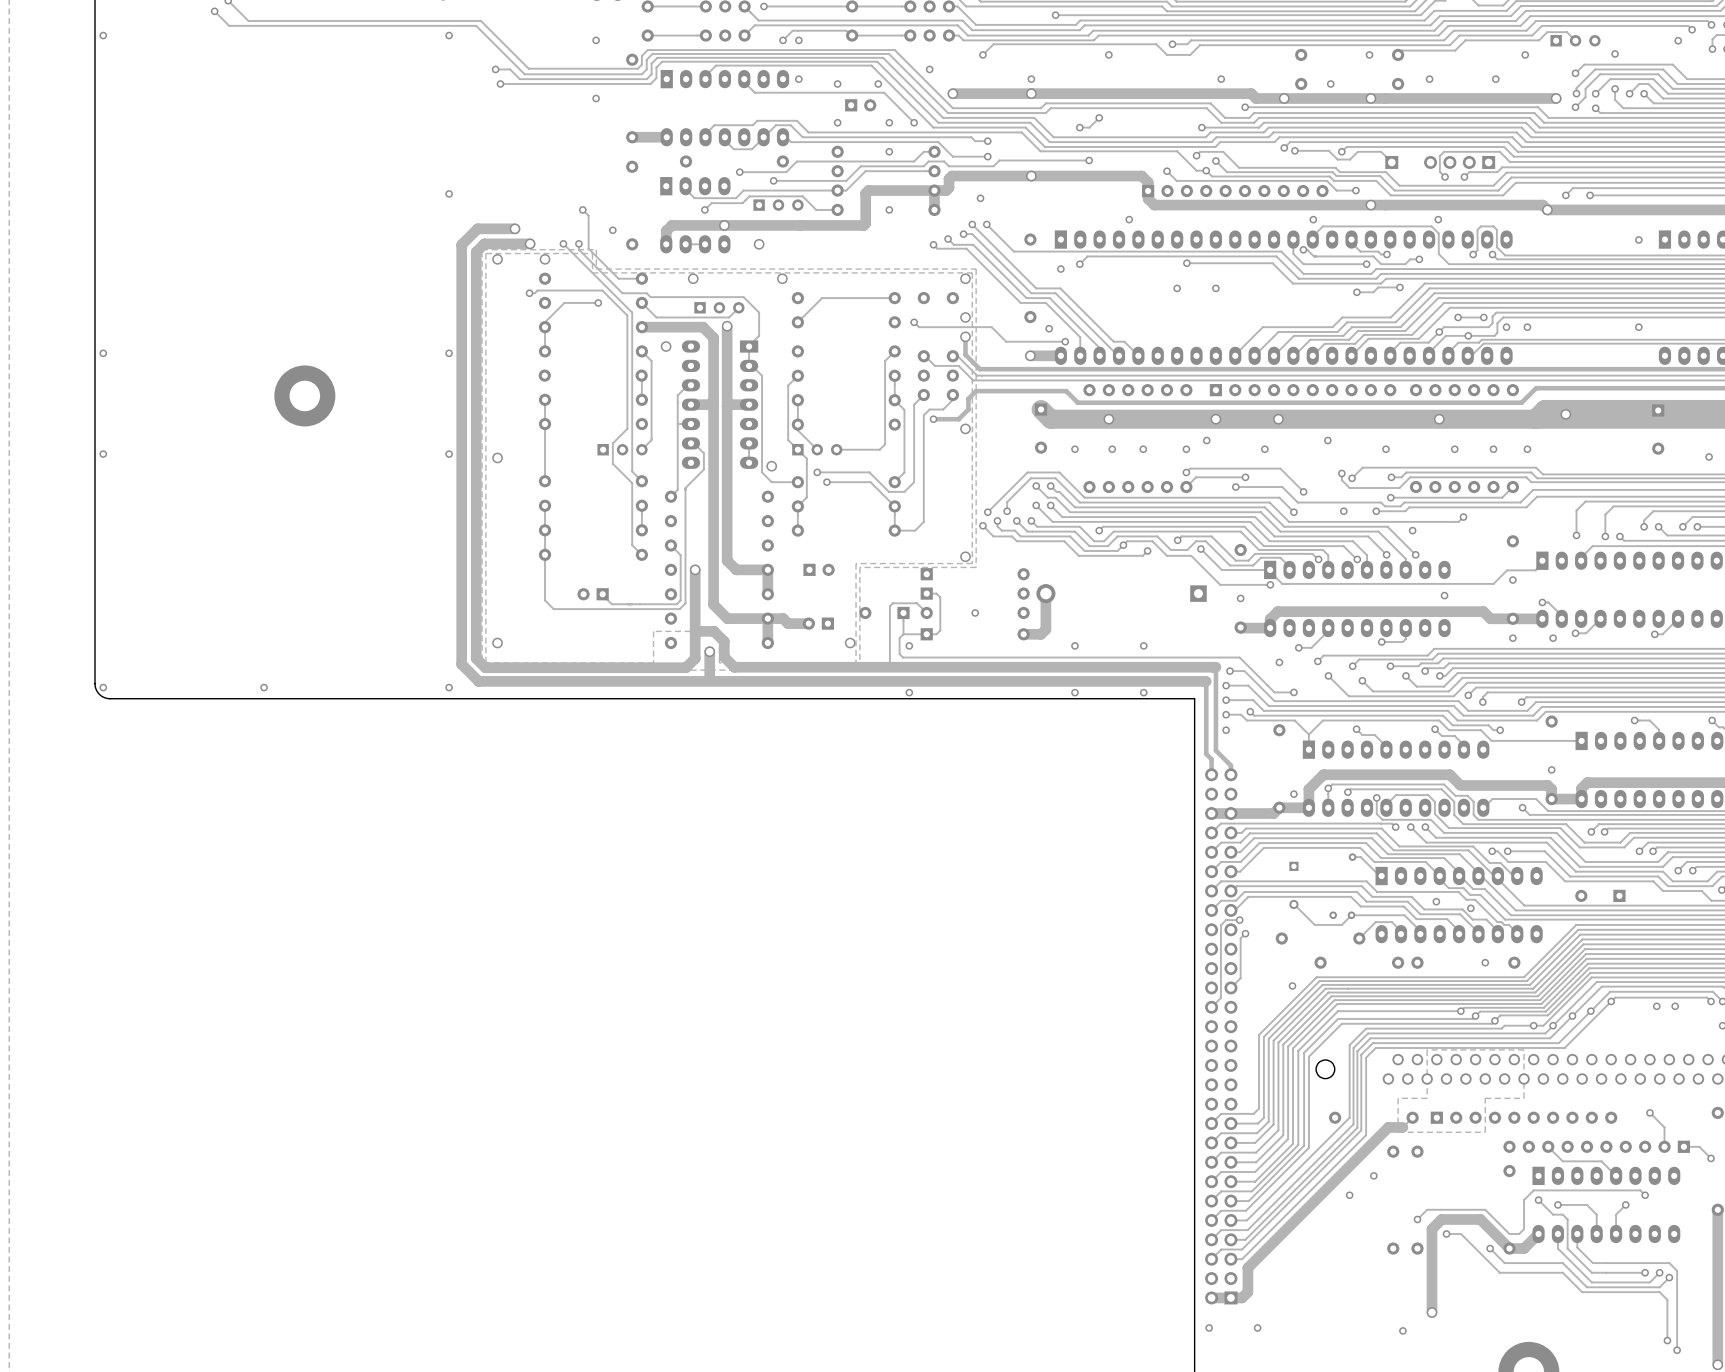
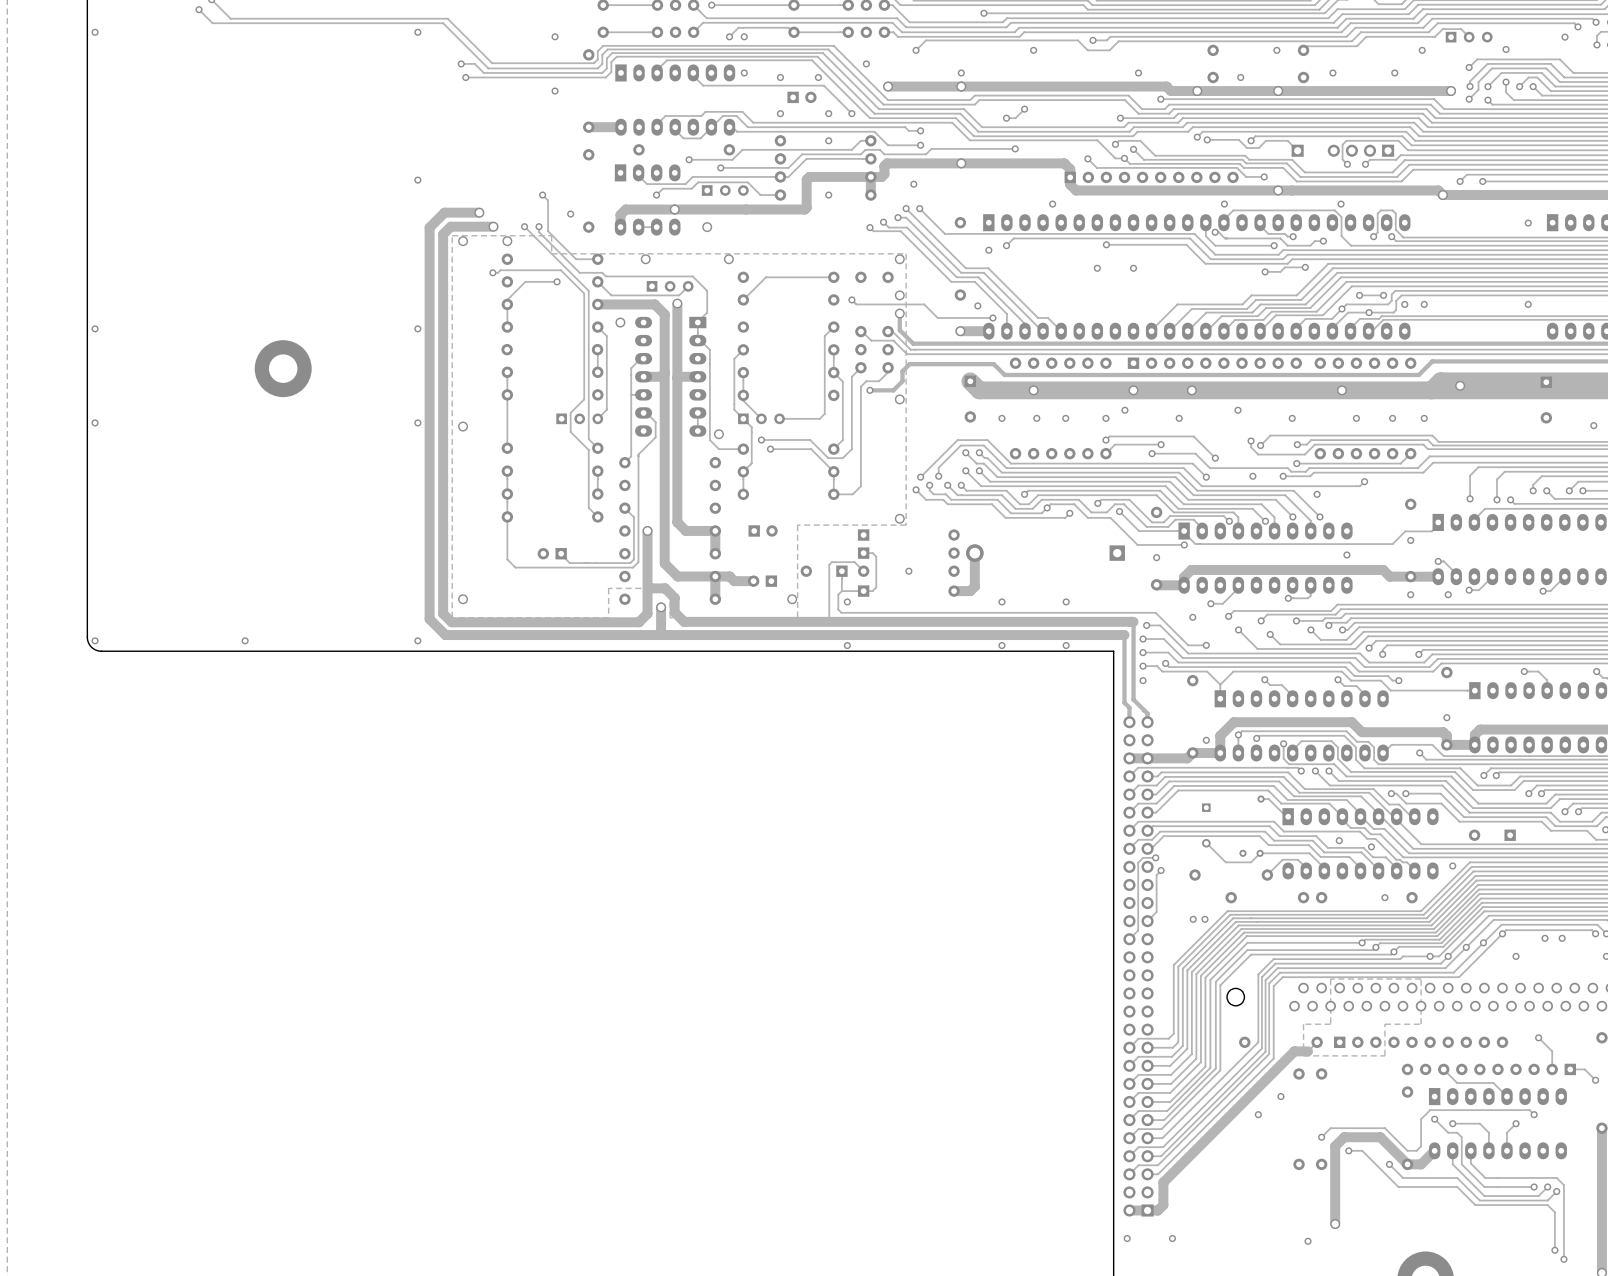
zone outline: (596, 249) (482, 249) (482, 670) (859, 670) (859, 567) (976, 567) (976, 269) (596, 269) (596, 249) -> none
via: none -> (1452, 865)
via: none -> (1193, 919)
via: none -> (1516, 956)

